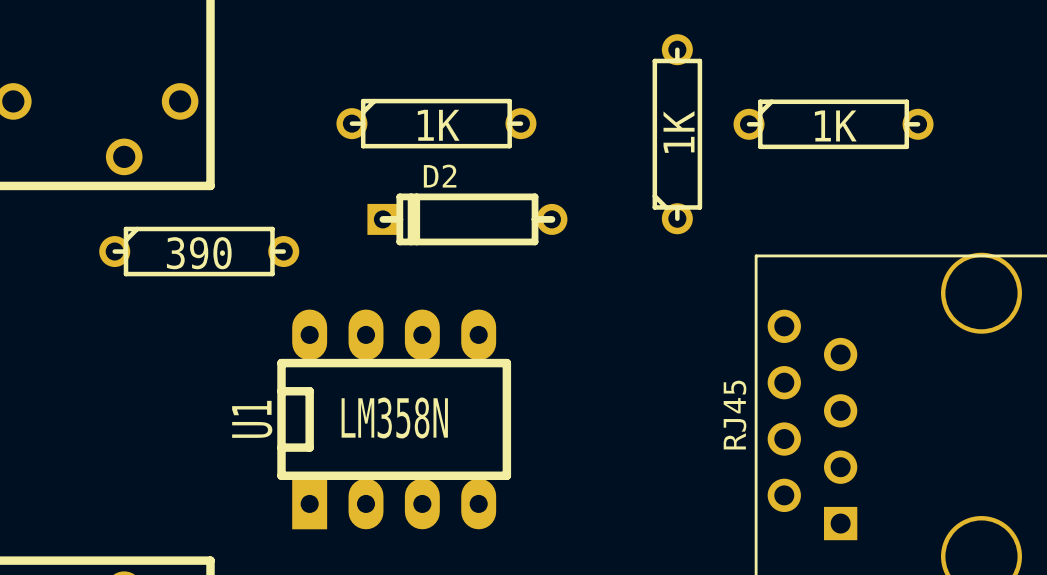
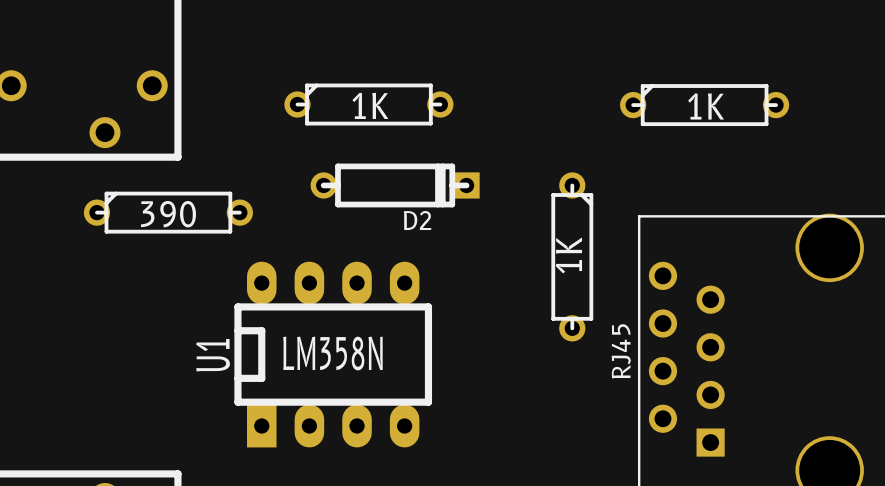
part rotation: 0° (677, 134) -> 180° (572, 256)
part position: (677, 134) -> (572, 256)
D2 rotation: 0° (467, 219) -> 180° (395, 185)

